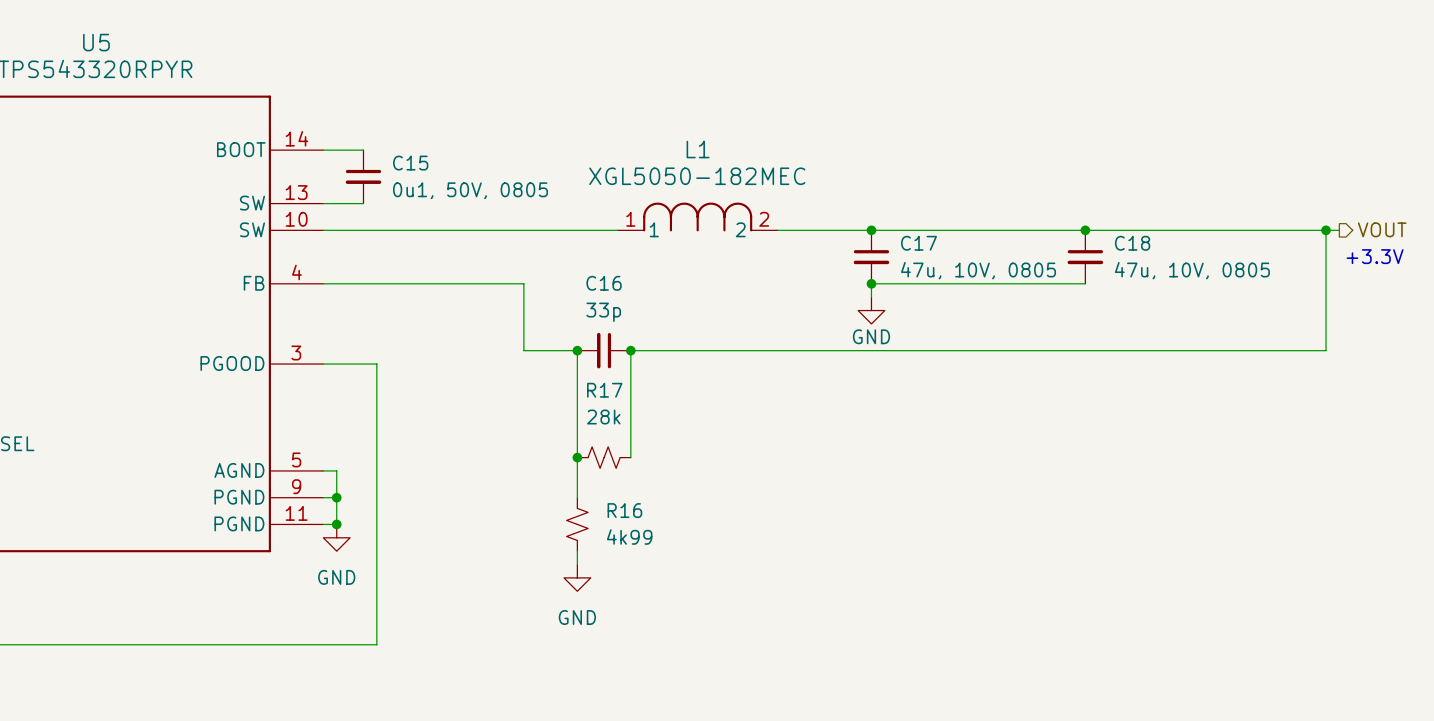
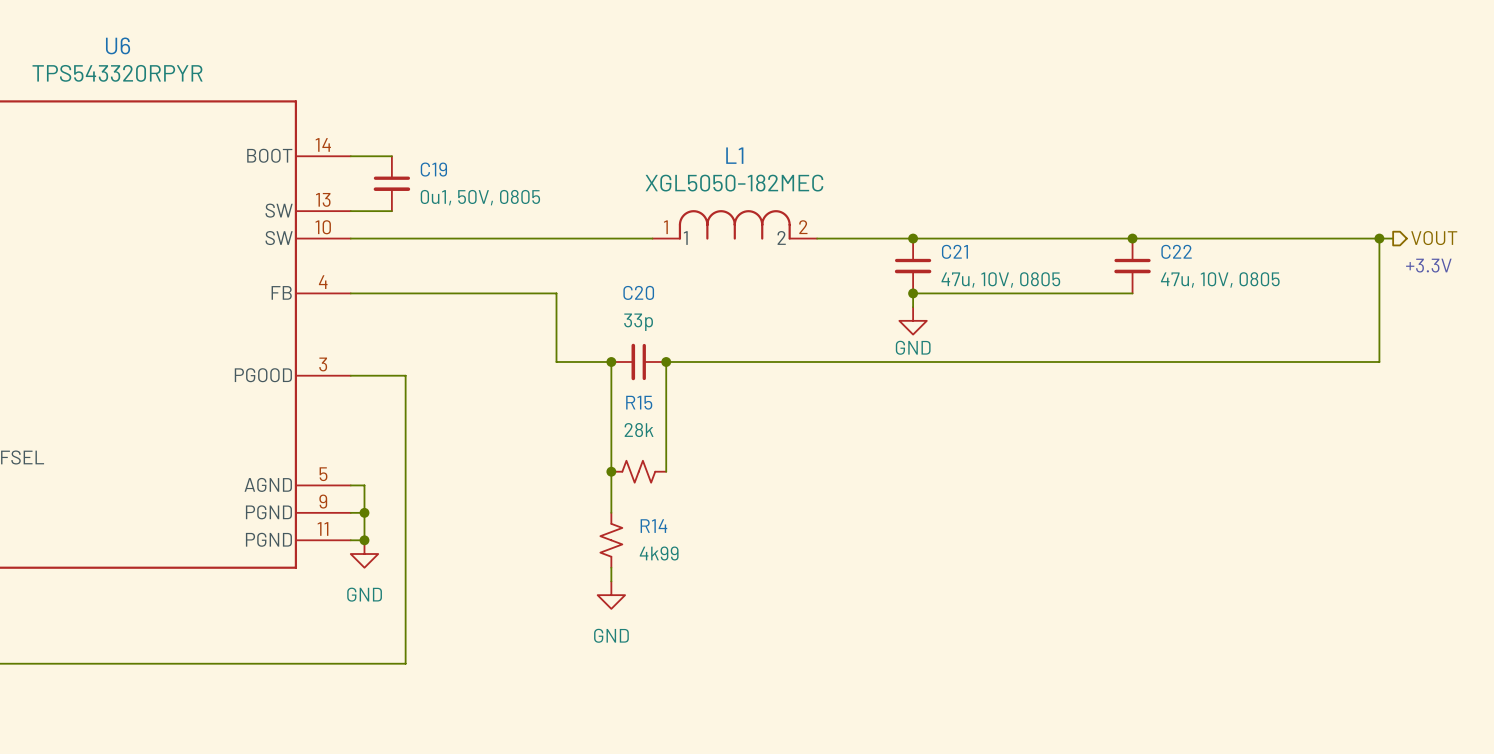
U5 name: U5 (96, 42) -> U6 (118, 45)
C15 name: C15 (410, 163) -> C19 (433, 169)
C17 name: C17 (919, 243) -> C21 (954, 251)
C18 name: C18 (1132, 243) -> C22 (1176, 251)
C16 name: C16 (604, 283) -> C20 (638, 292)
R17 name: R17 (604, 390) -> R15 (639, 402)
R16 name: R16 (624, 510) -> R14 (653, 526)

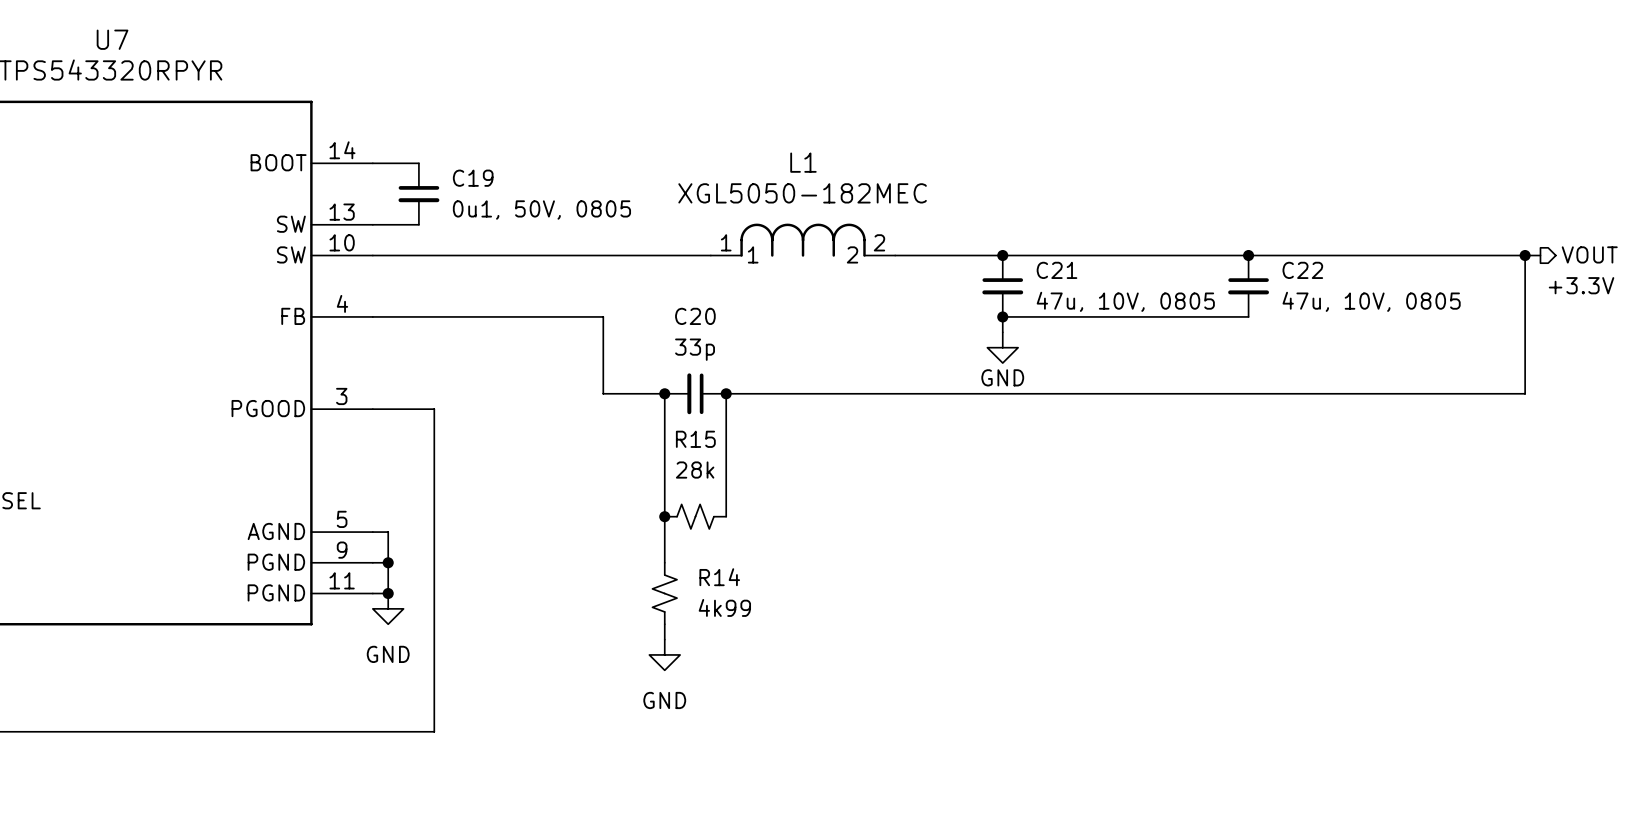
U6 name: U6 (118, 45) -> U7 (112, 39)

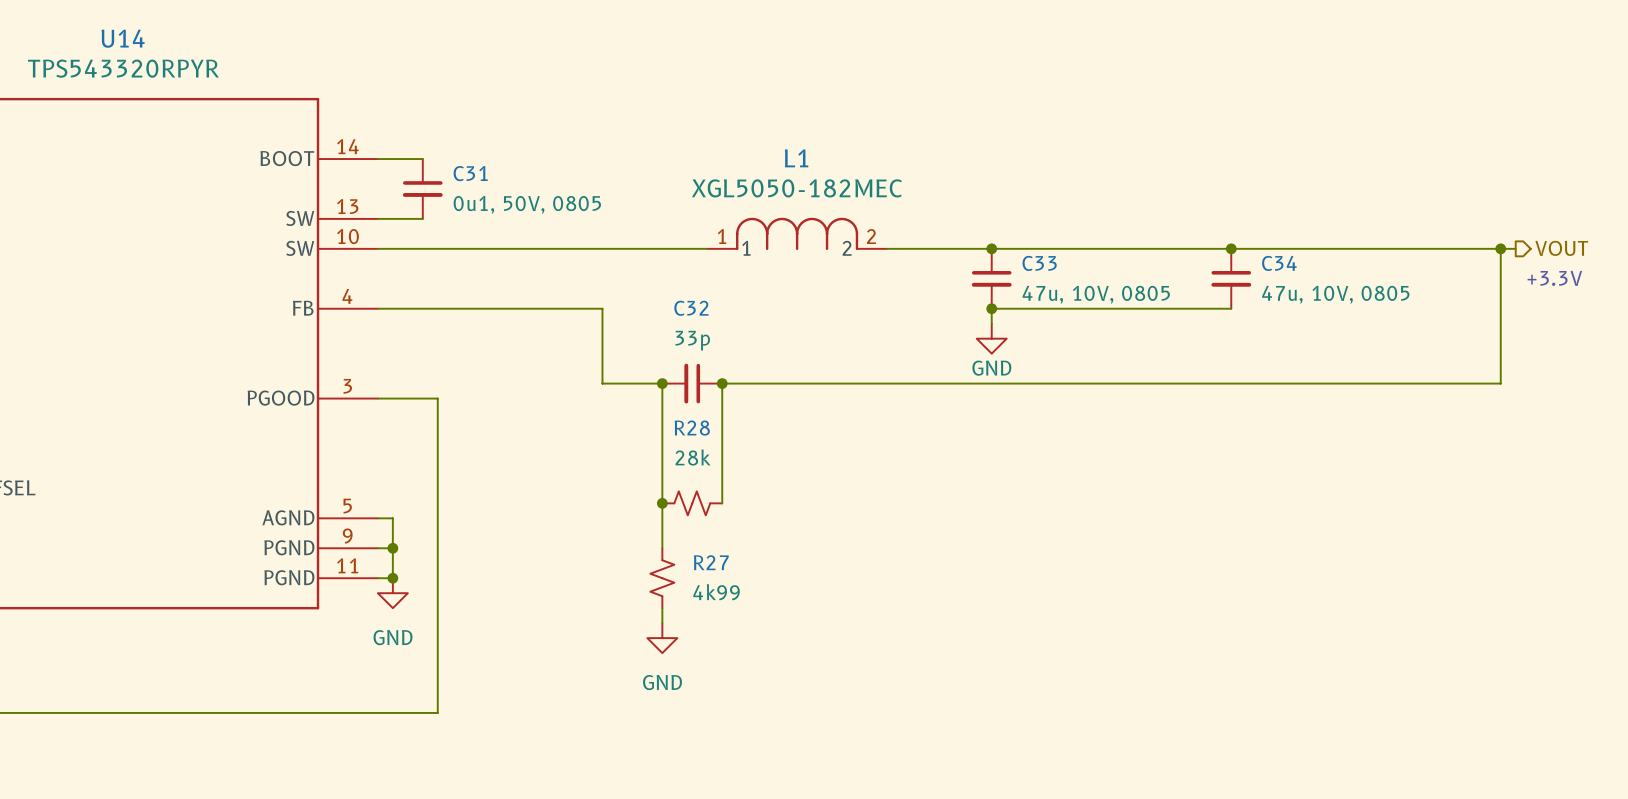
U7 name: U7 (112, 39) -> U14 (123, 38)
C19 name: C19 (473, 178) -> C31 (470, 173)
C21 name: C21 (1057, 270) -> C33 (1039, 263)
C22 name: C22 (1302, 270) -> C34 (1279, 263)
C20 name: C20 (695, 316) -> C32 (691, 308)
R15 name: R15 (695, 439) -> R28 (692, 428)
R14 name: R14 (719, 577) -> R27 (711, 562)

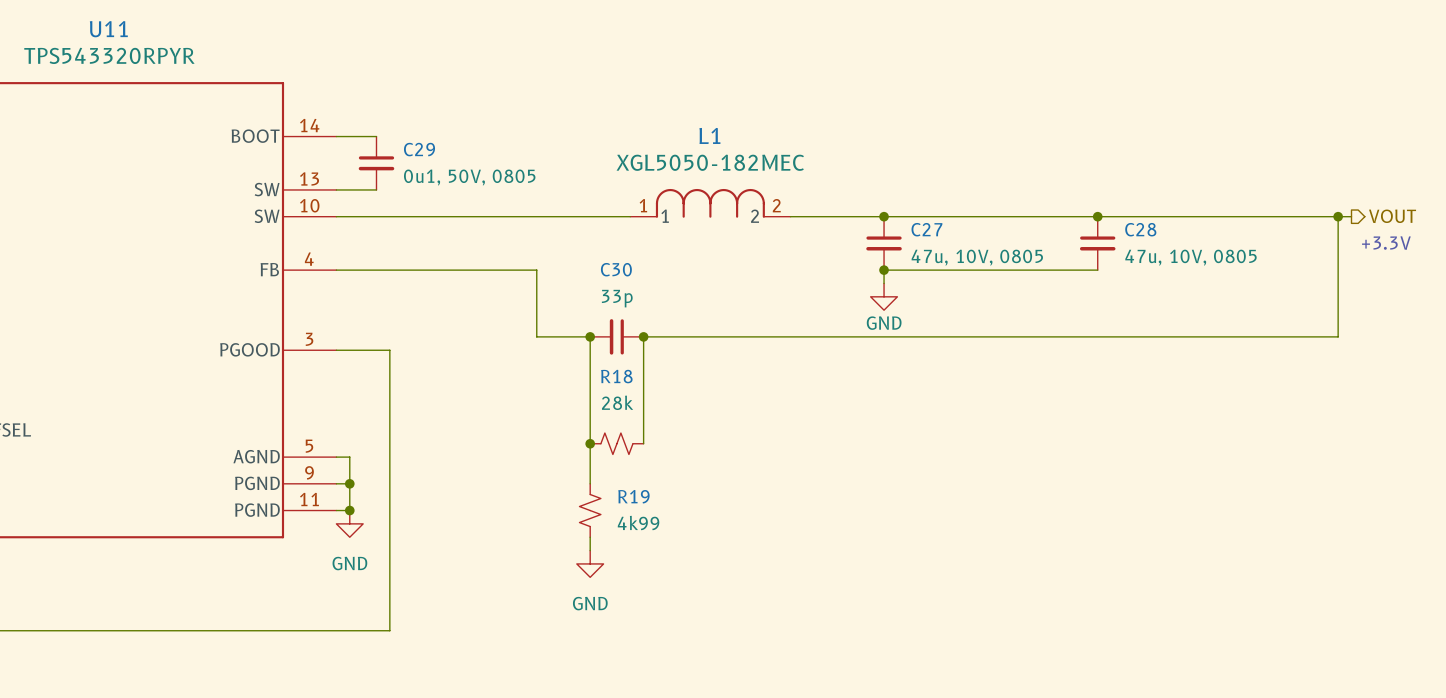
U14 name: U14 (123, 38) -> U11 (108, 29)
C31 name: C31 (470, 173) -> C29 (419, 149)
C33 name: C33 (1039, 263) -> C27 (926, 229)
C34 name: C34 (1279, 263) -> C28 (1140, 229)
C32 name: C32 (691, 308) -> C30 (616, 269)
R28 name: R28 (692, 428) -> R18 (616, 376)
R27 name: R27 (711, 562) -> R19 (633, 496)

